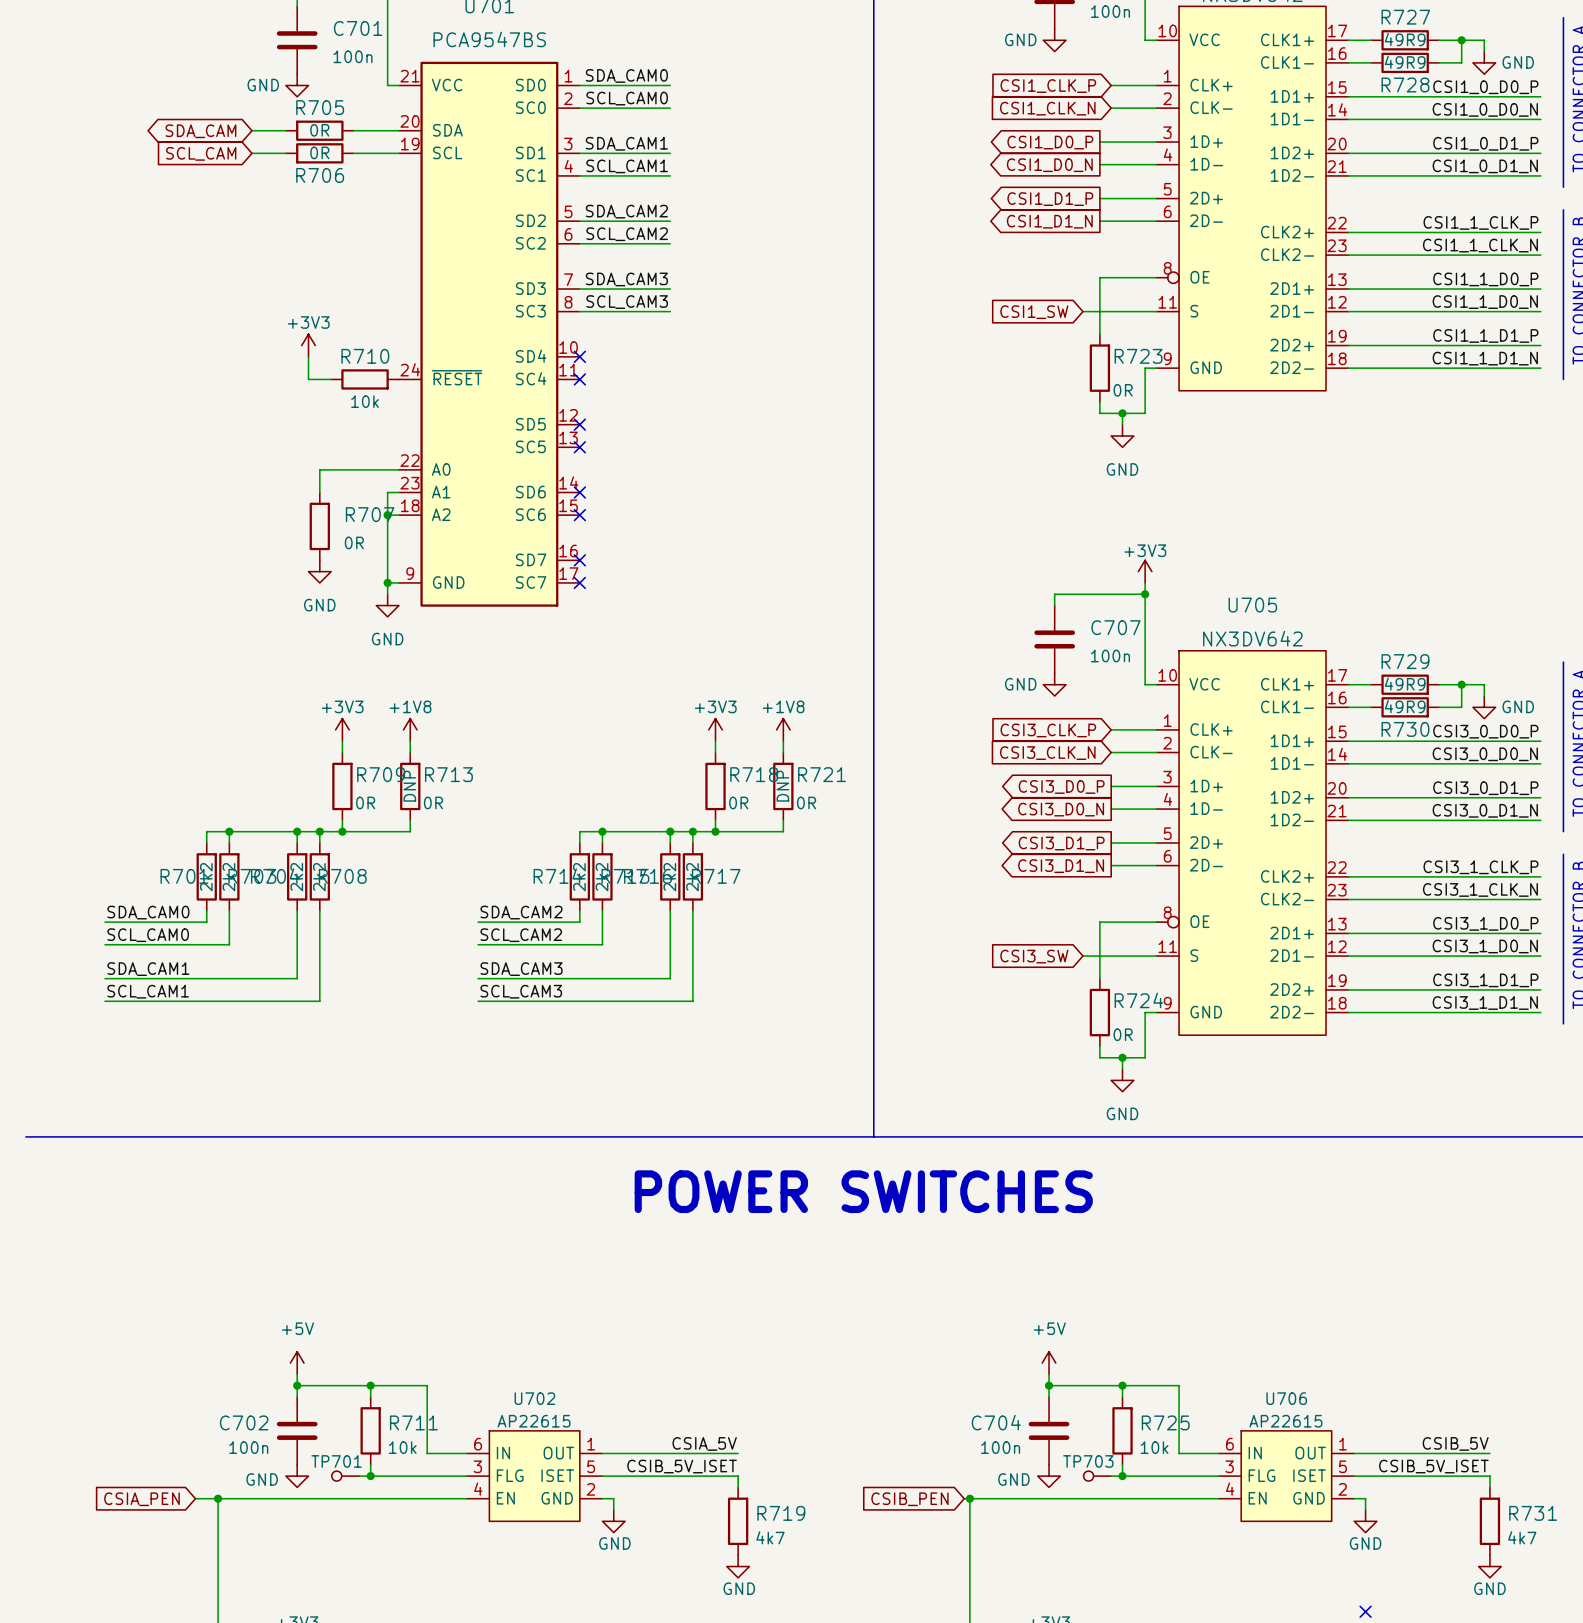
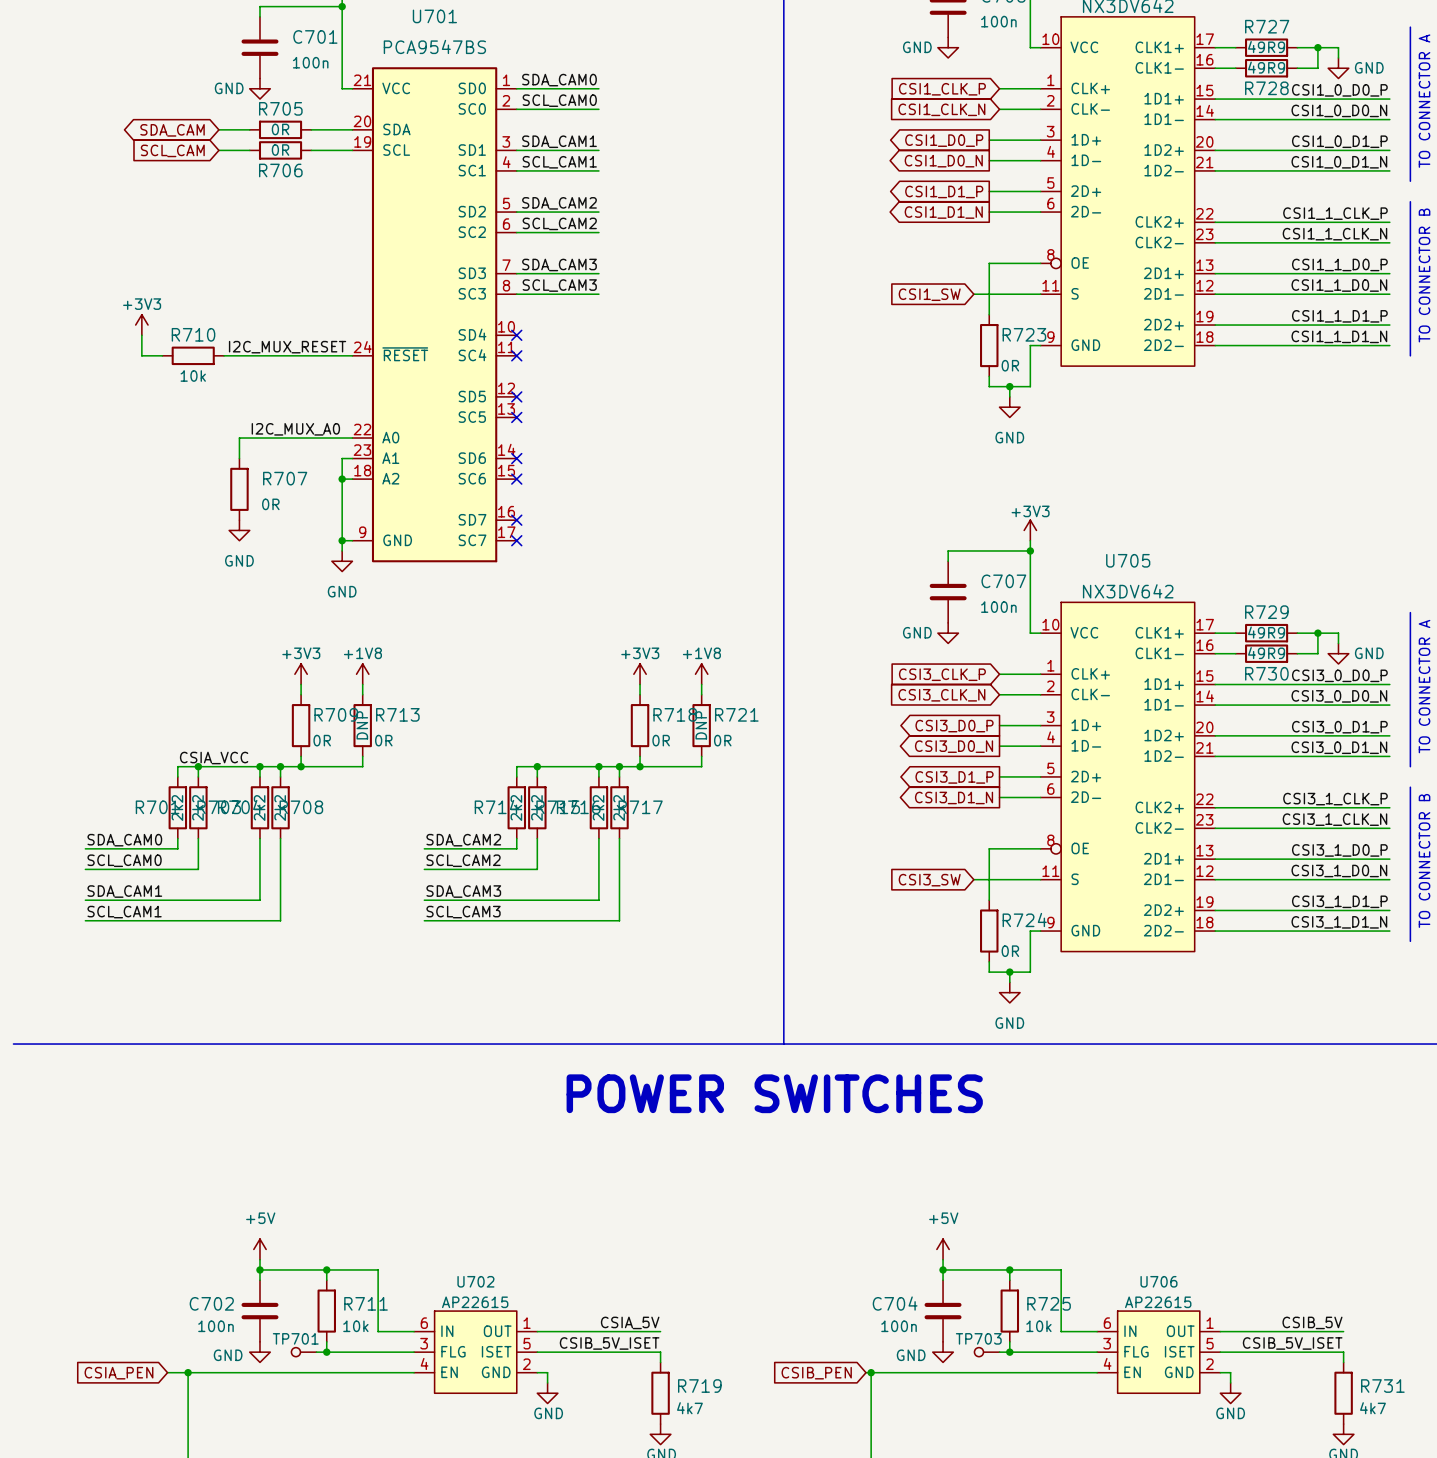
power symbol position: +3V3 (308, 345) -> +3V3 (141, 325)
wire: none -> (141, 335) (141, 355) (162, 355)
wire: (308, 356) (308, 379) -> (224, 355) (270, 355)
label: none -> I2C_MUX_RESET (287, 347)
wire: none -> (290, 355) (352, 355)
R710 position: (365, 379) -> (193, 355)
label: none -> I2C_MUX_A0 (295, 429)
wire: (319, 469) (319, 492) -> (280, 438) (239, 438) (239, 458)
R707 position: (319, 526) -> (239, 489)
power symbol position: GND (319, 571) -> GND (239, 530)
label: none -> CSIA_VCC (214, 758)

